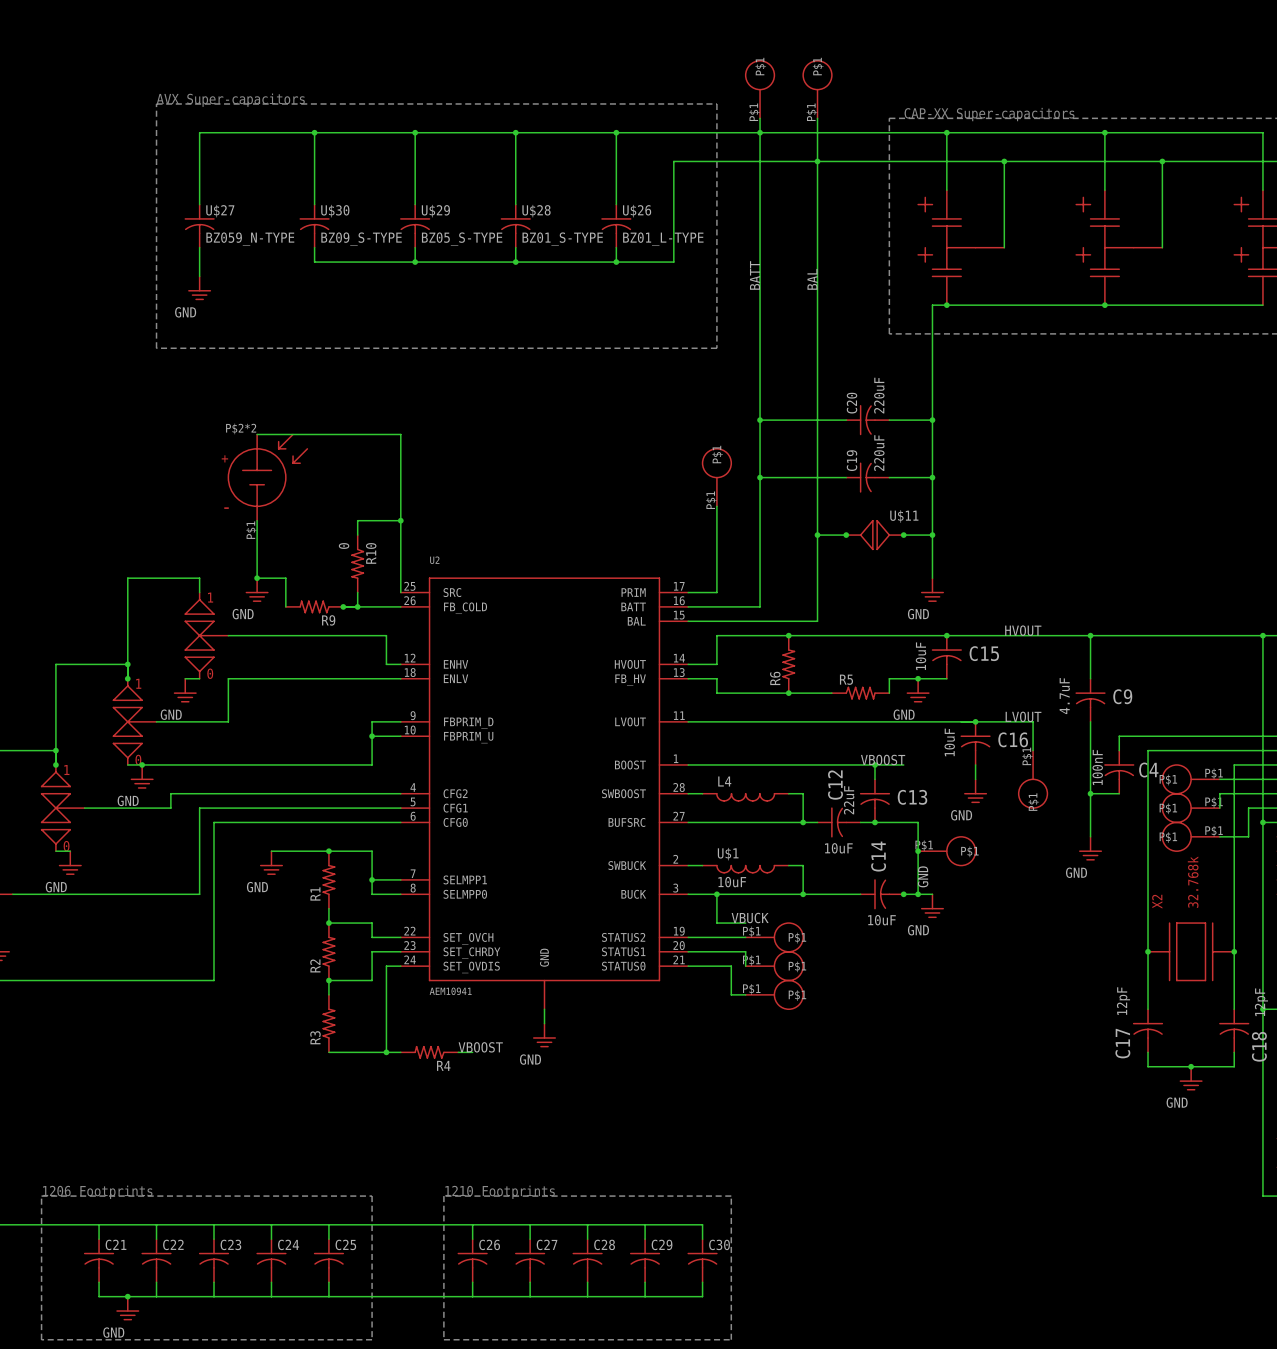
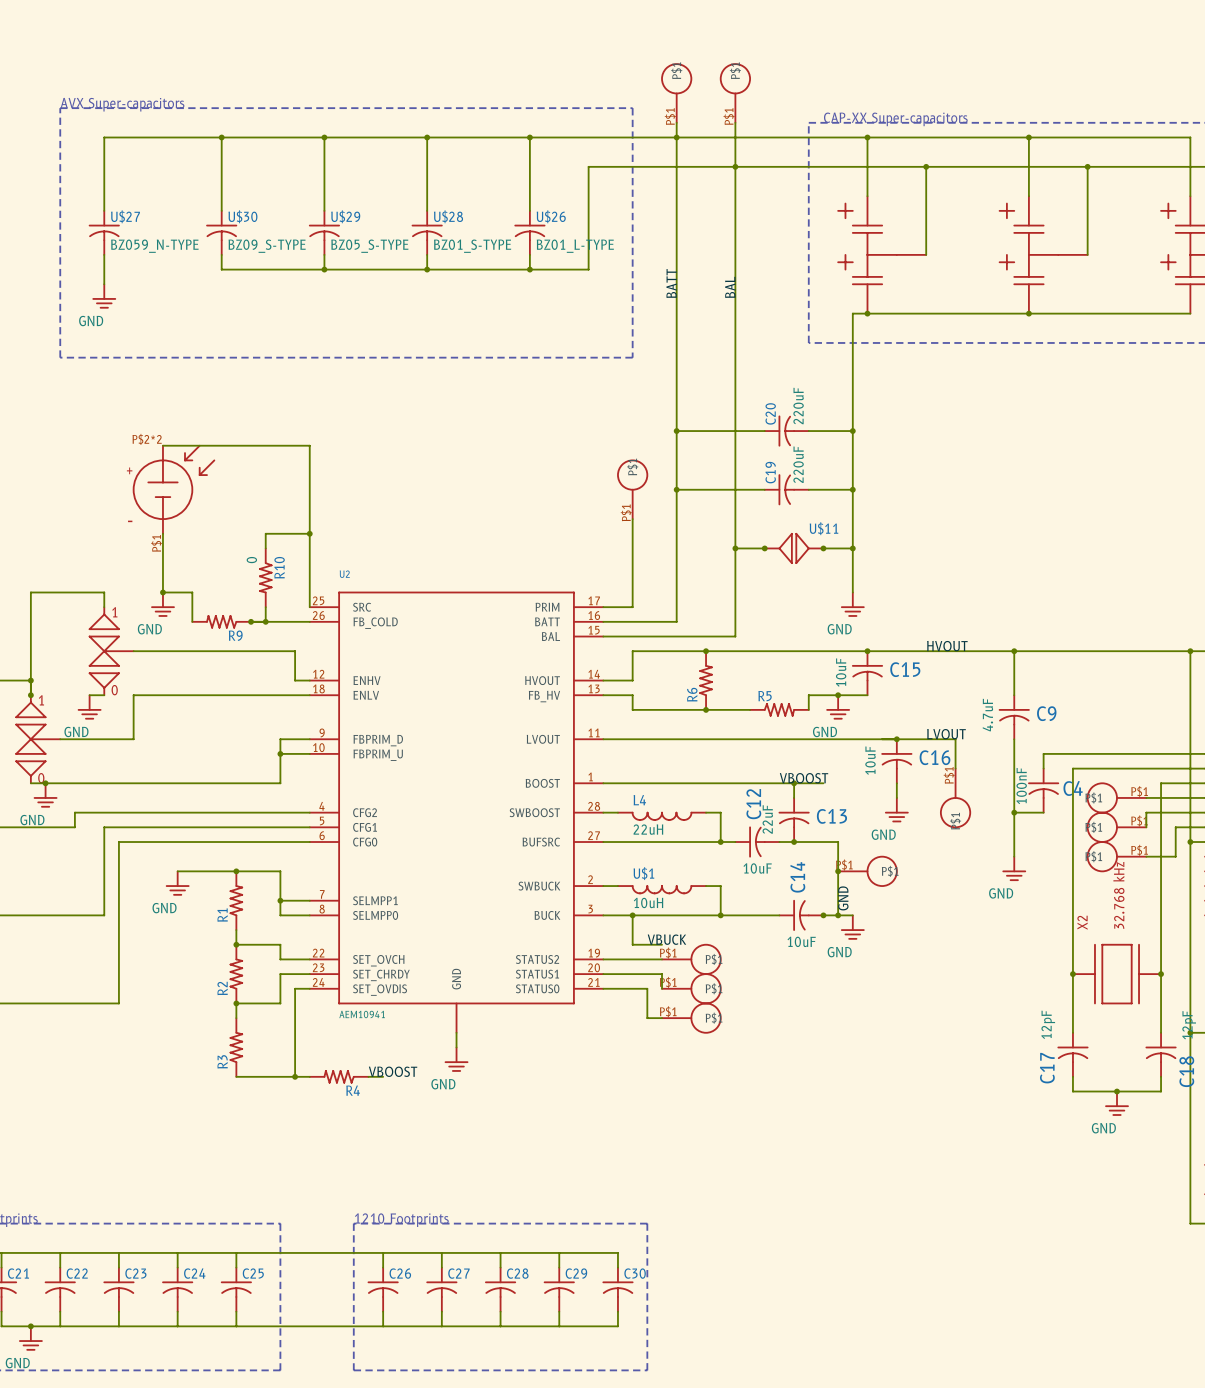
L4 value: none -> 22uH (648, 829)
U$1 value: 10uF (732, 882) -> 10uH (648, 902)
X2 value: 32.768k (1193, 882) -> 32.768 kHz (1118, 895)

